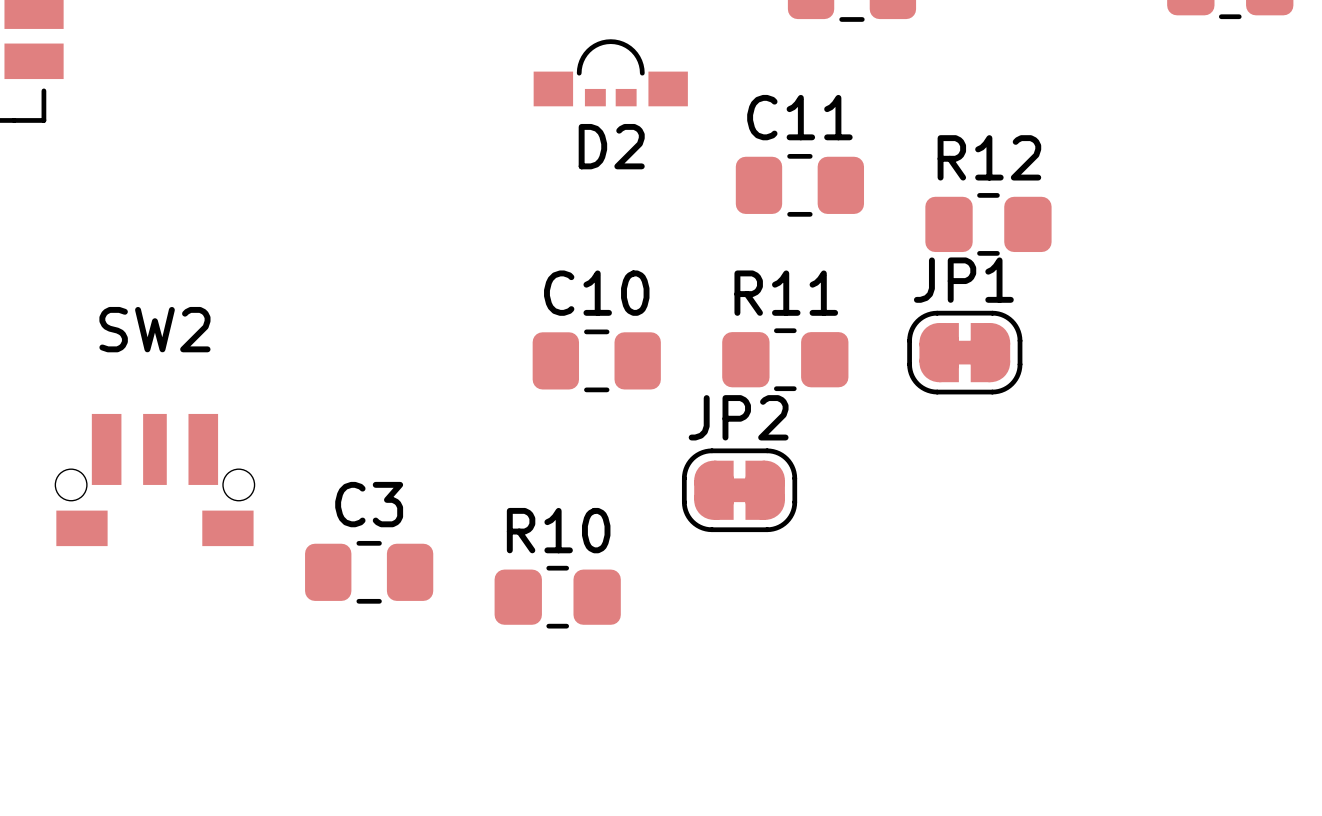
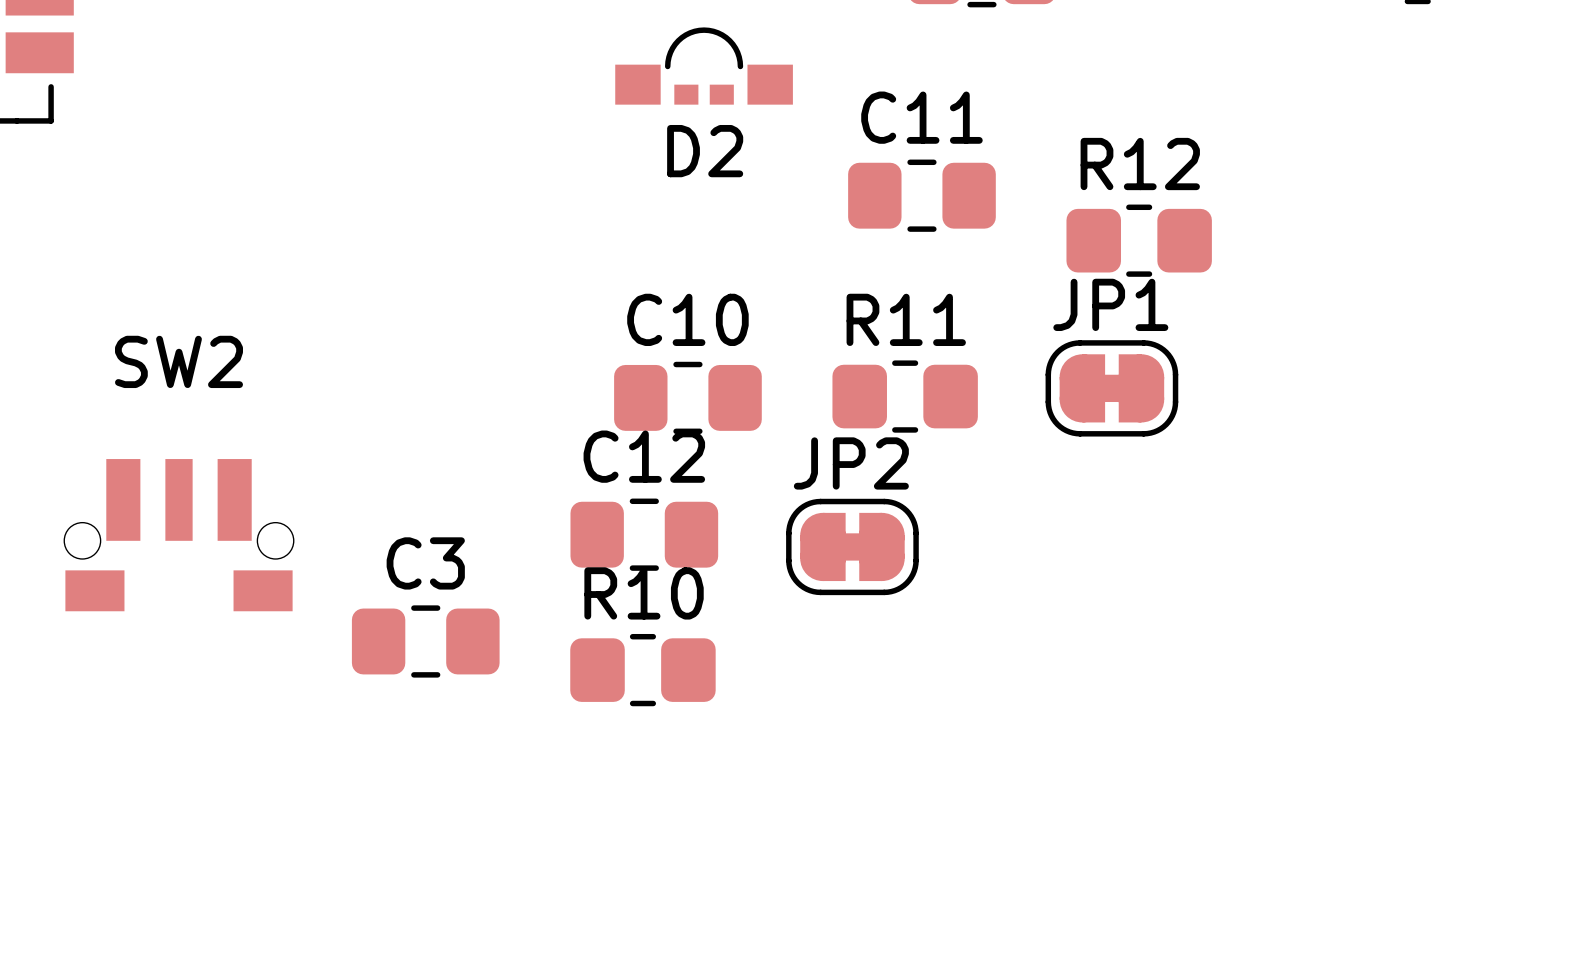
C12: none -> (644, 534)

